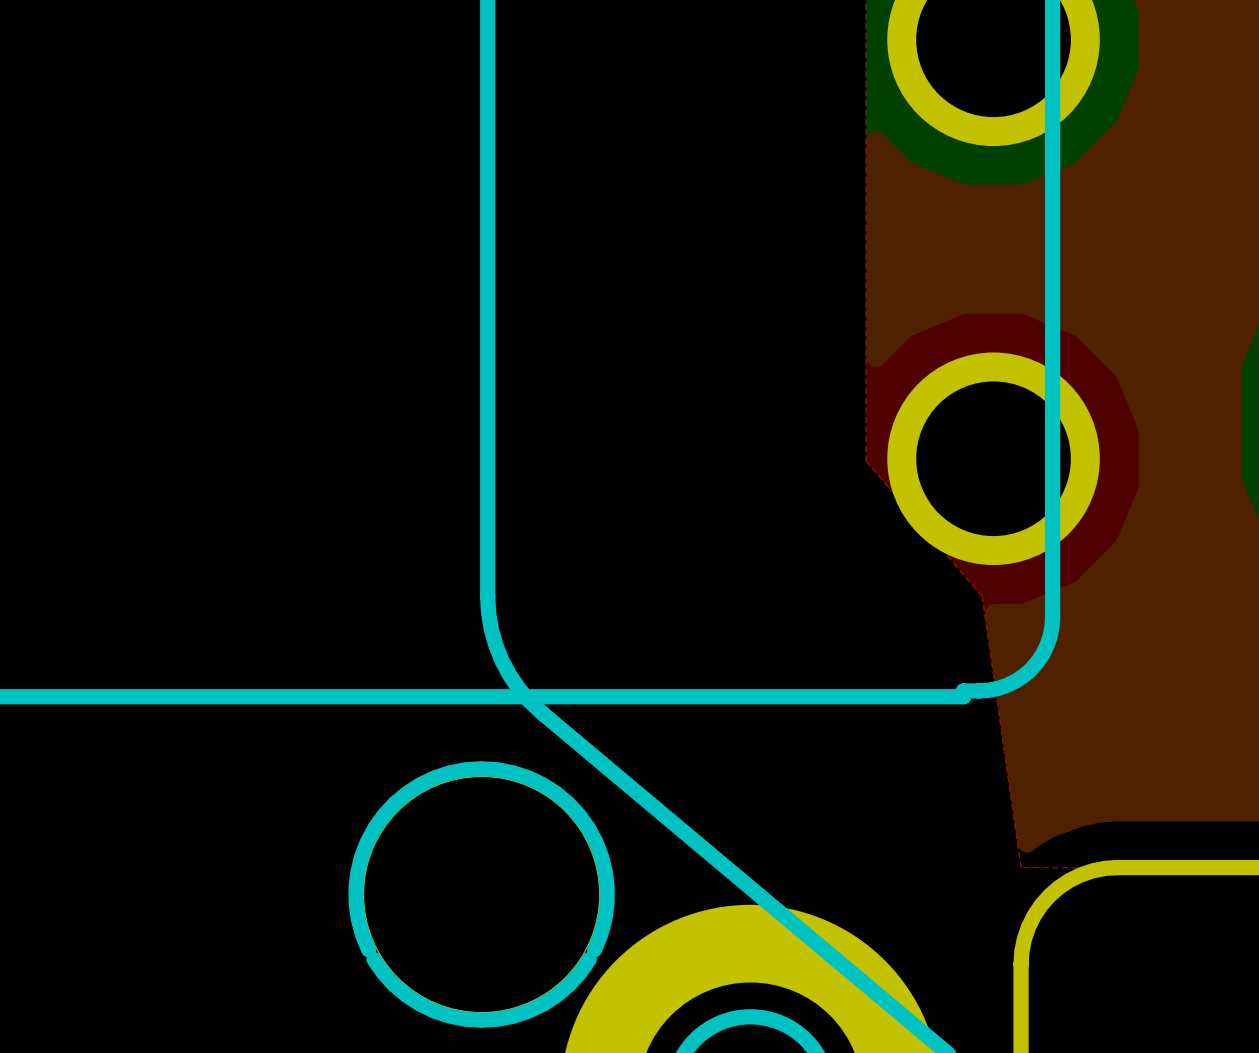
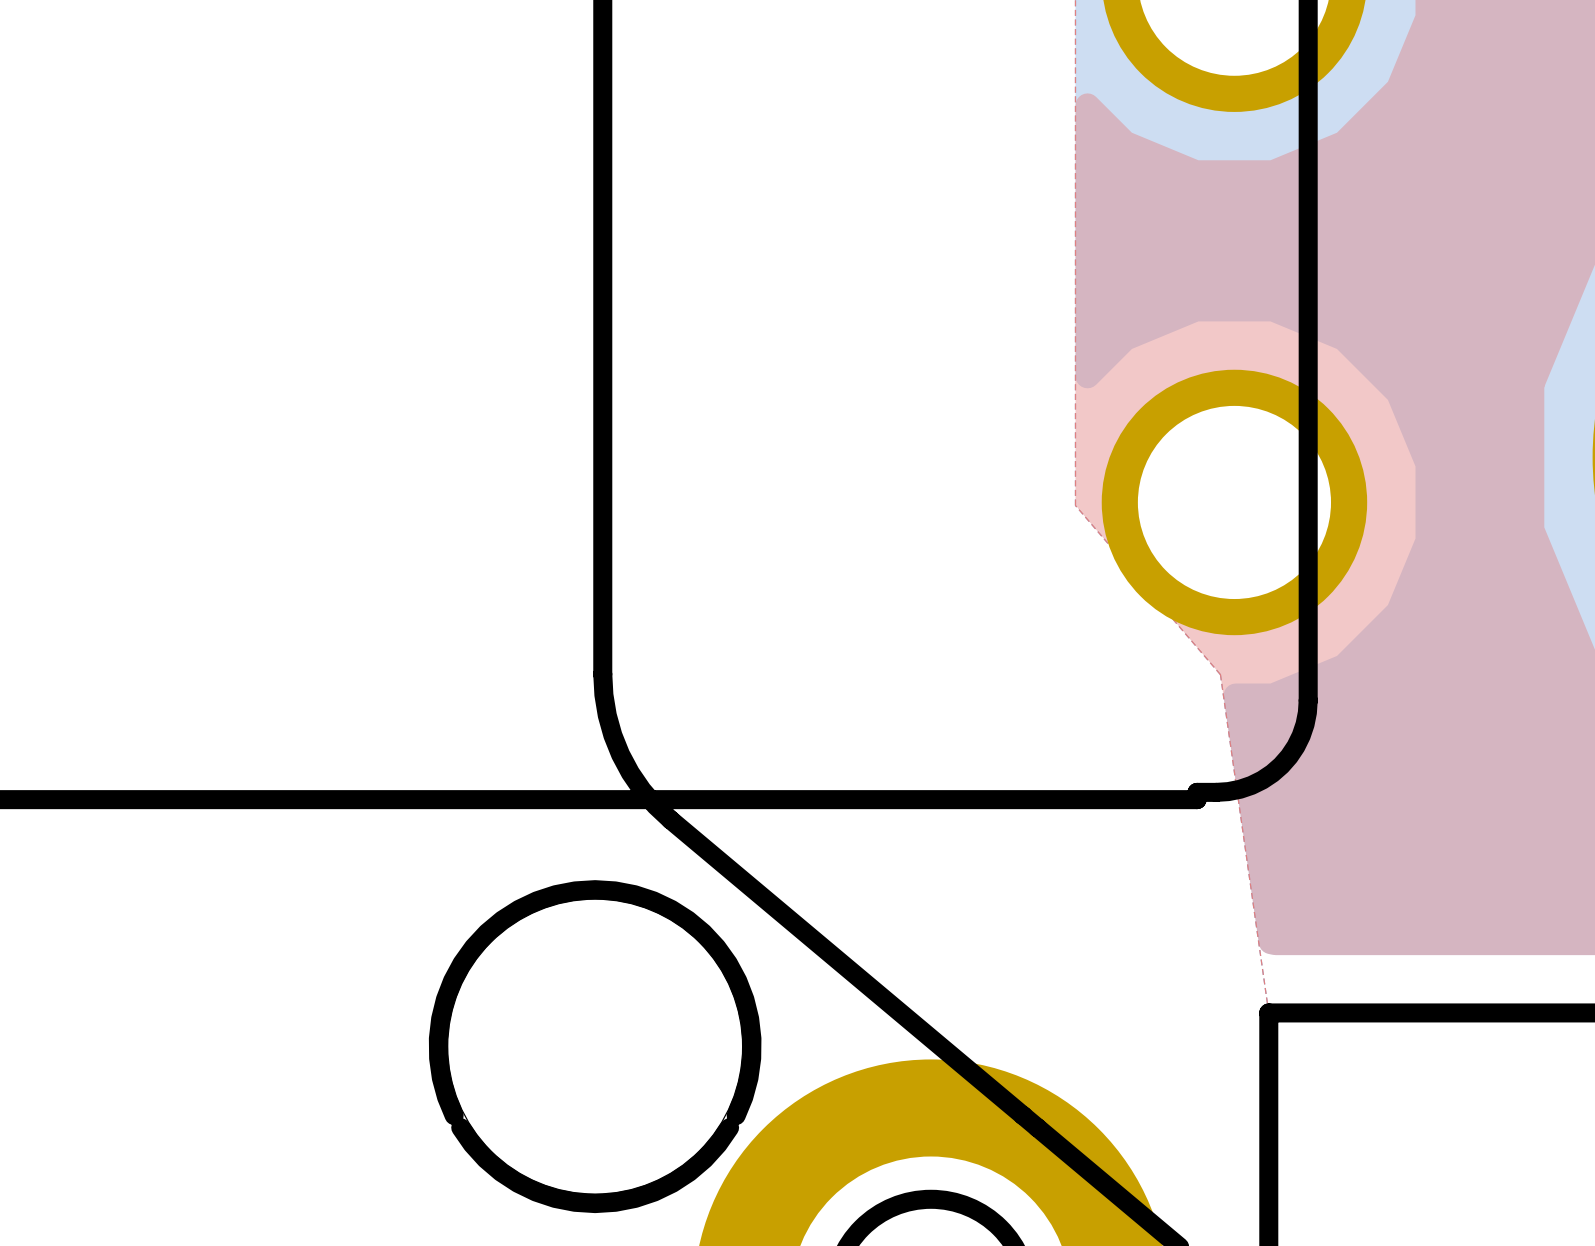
board edge: (1117, 867) (1105, 868) (1080, 874) (1058, 887) (1049, 895) (1041, 905) (1028, 927) (1024, 939) (1021, 964) -> (1389, 1012) (1268, 1012) (1268, 1133)

